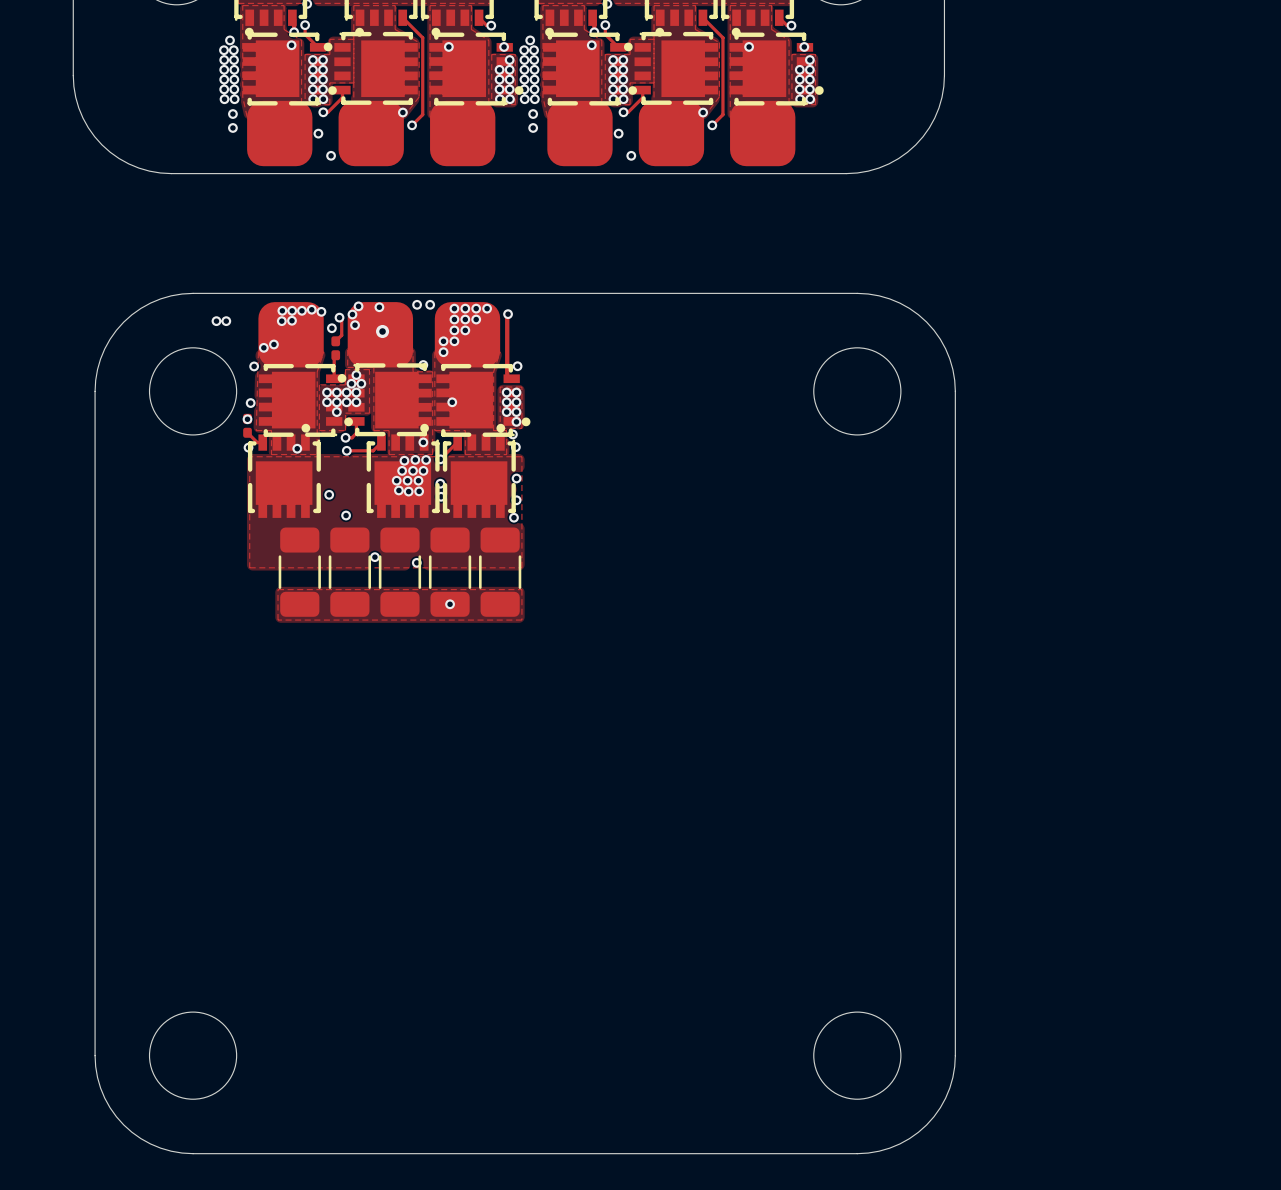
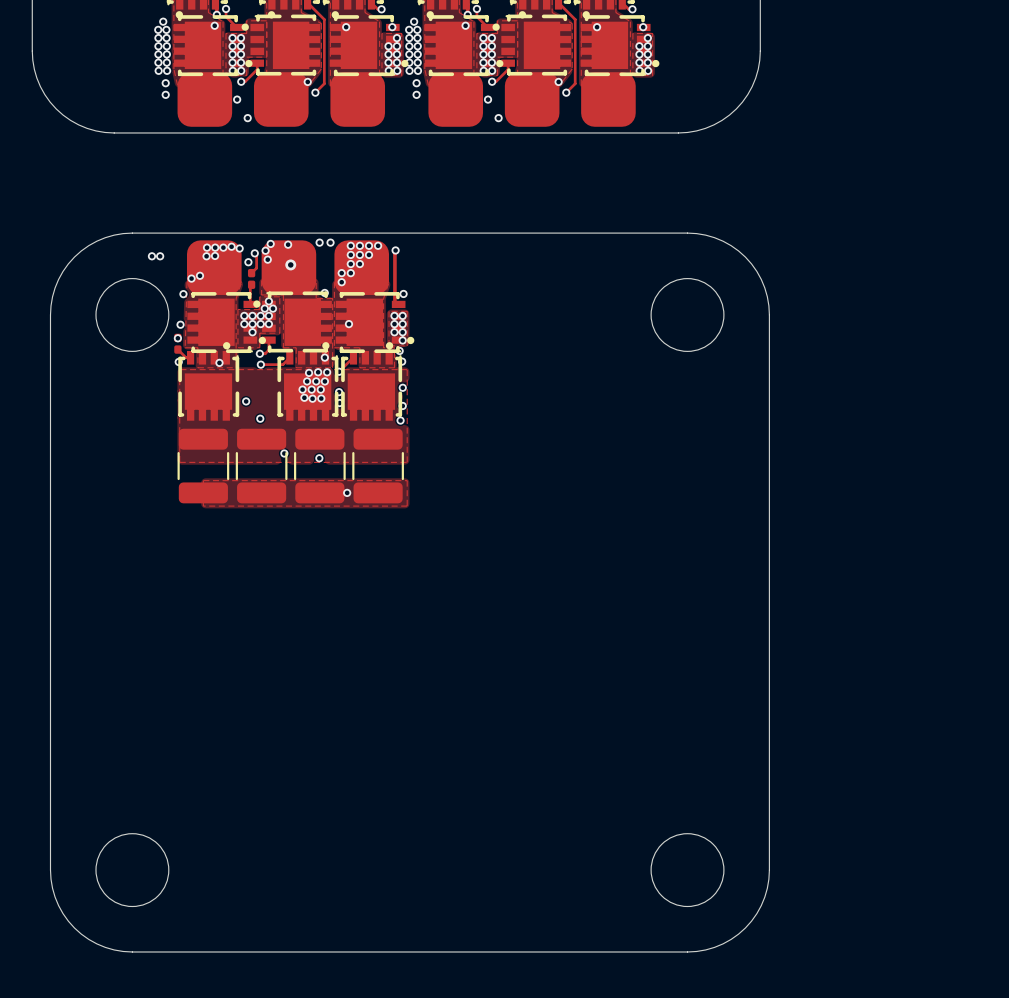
part footprint: [328, 527, 372, 617] -> [235, 428, 288, 504]
part footprint: [479, 527, 522, 617] -> [352, 428, 404, 504]
part: none -> (203, 466)
part: (299, 572) -> none
part: (399, 572) -> none
part: none -> (319, 466)
part: (450, 572) -> none

